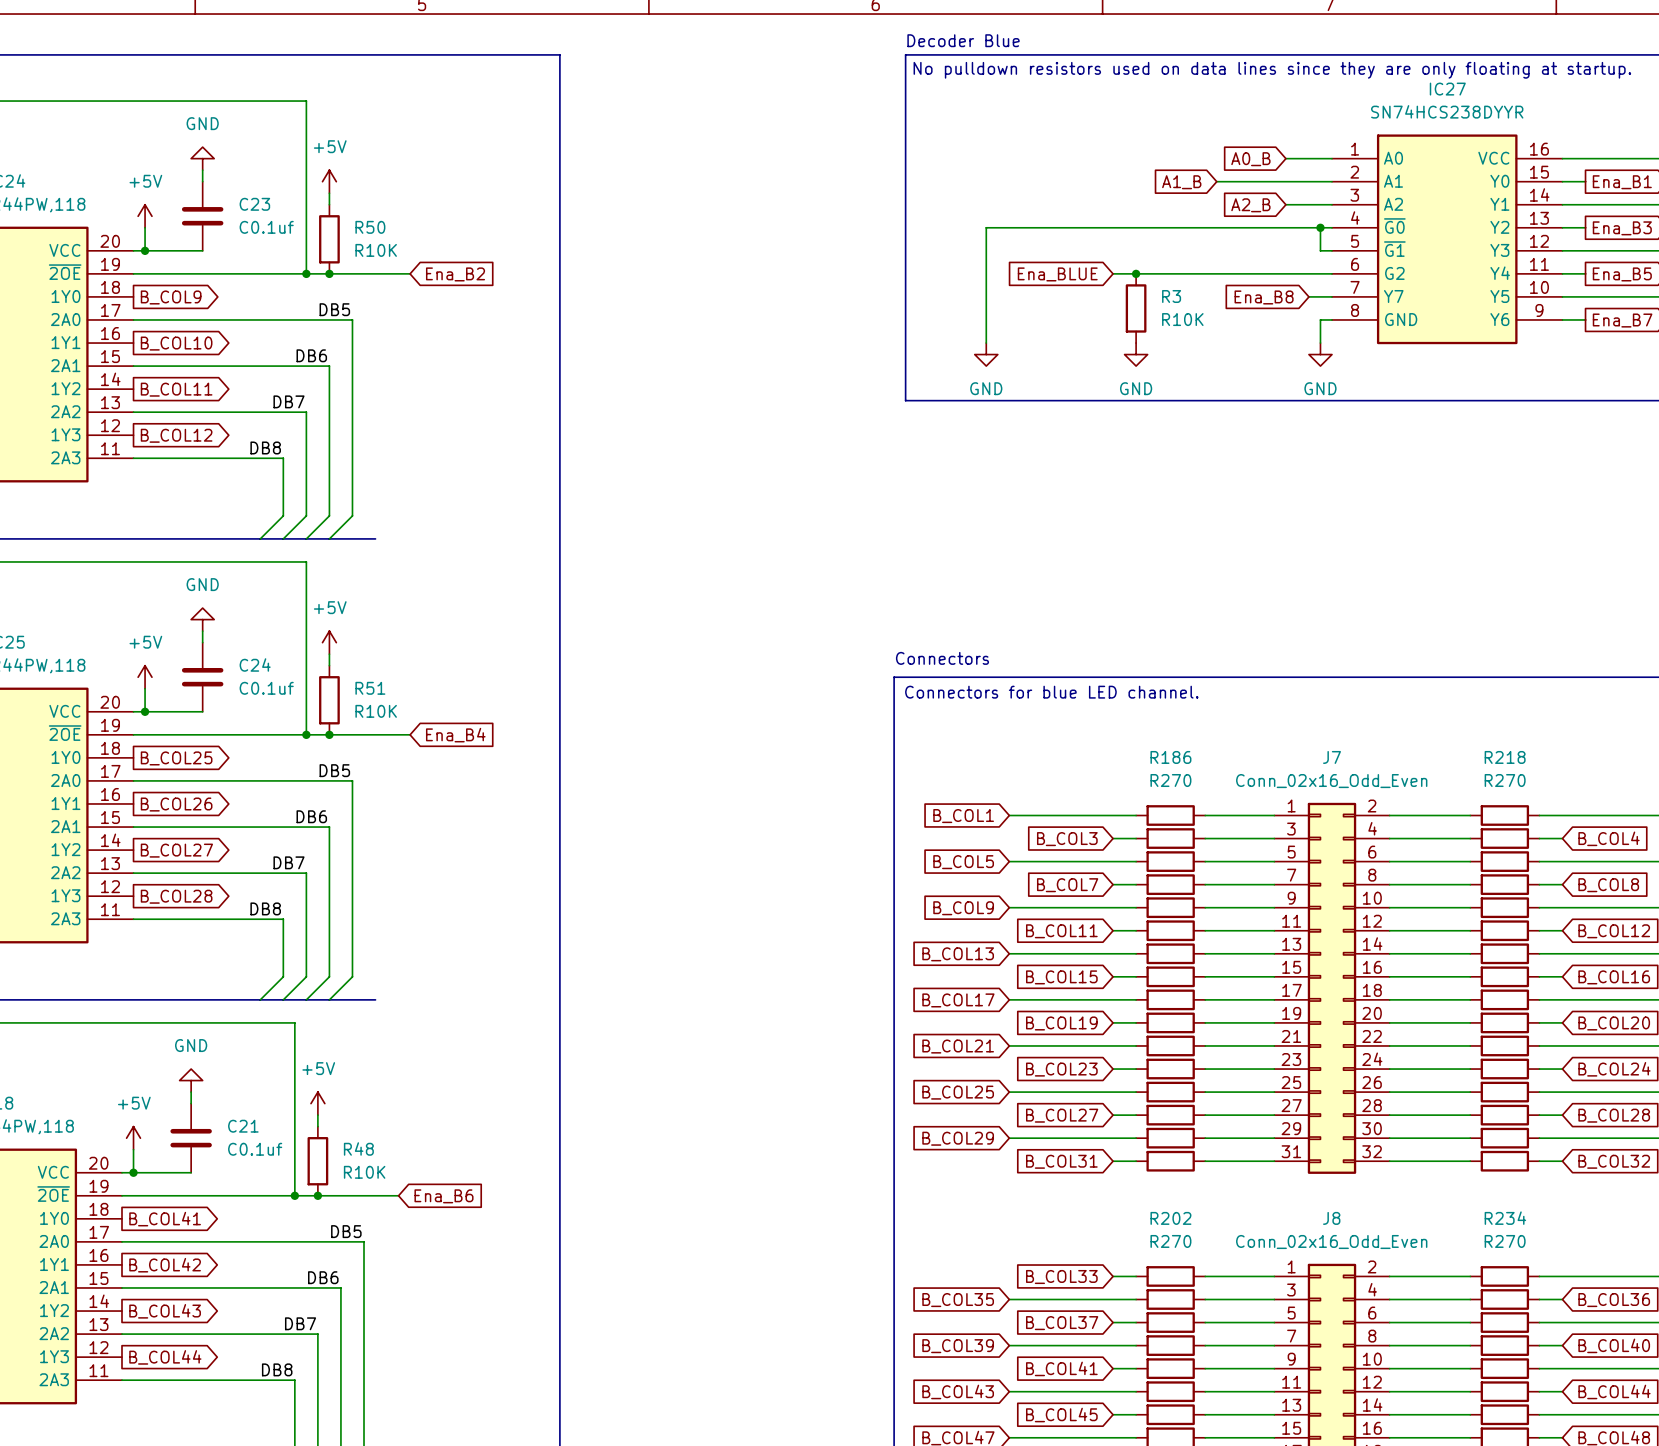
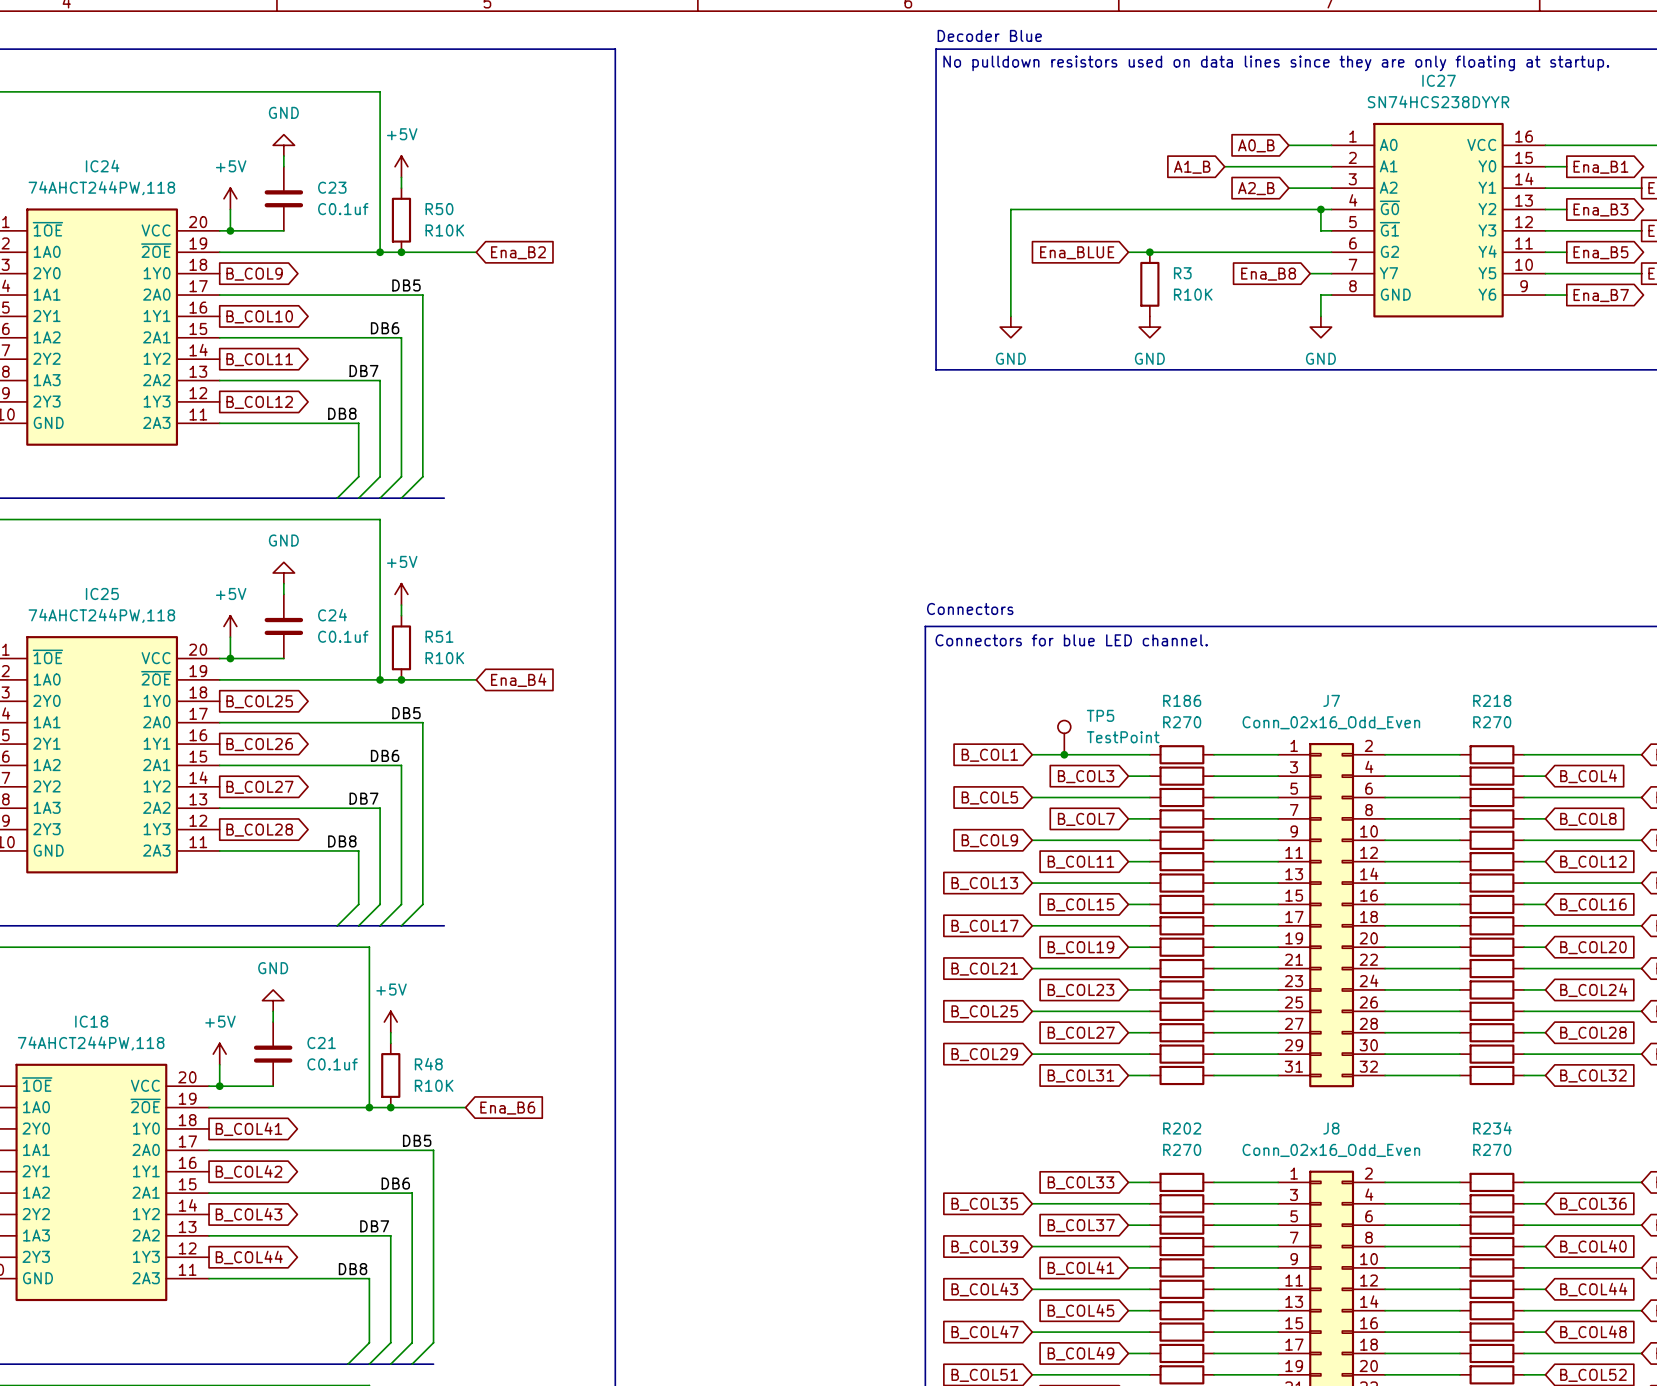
TP5: none -> TestPoint (1064, 737)
junction: none -> (1064, 754)

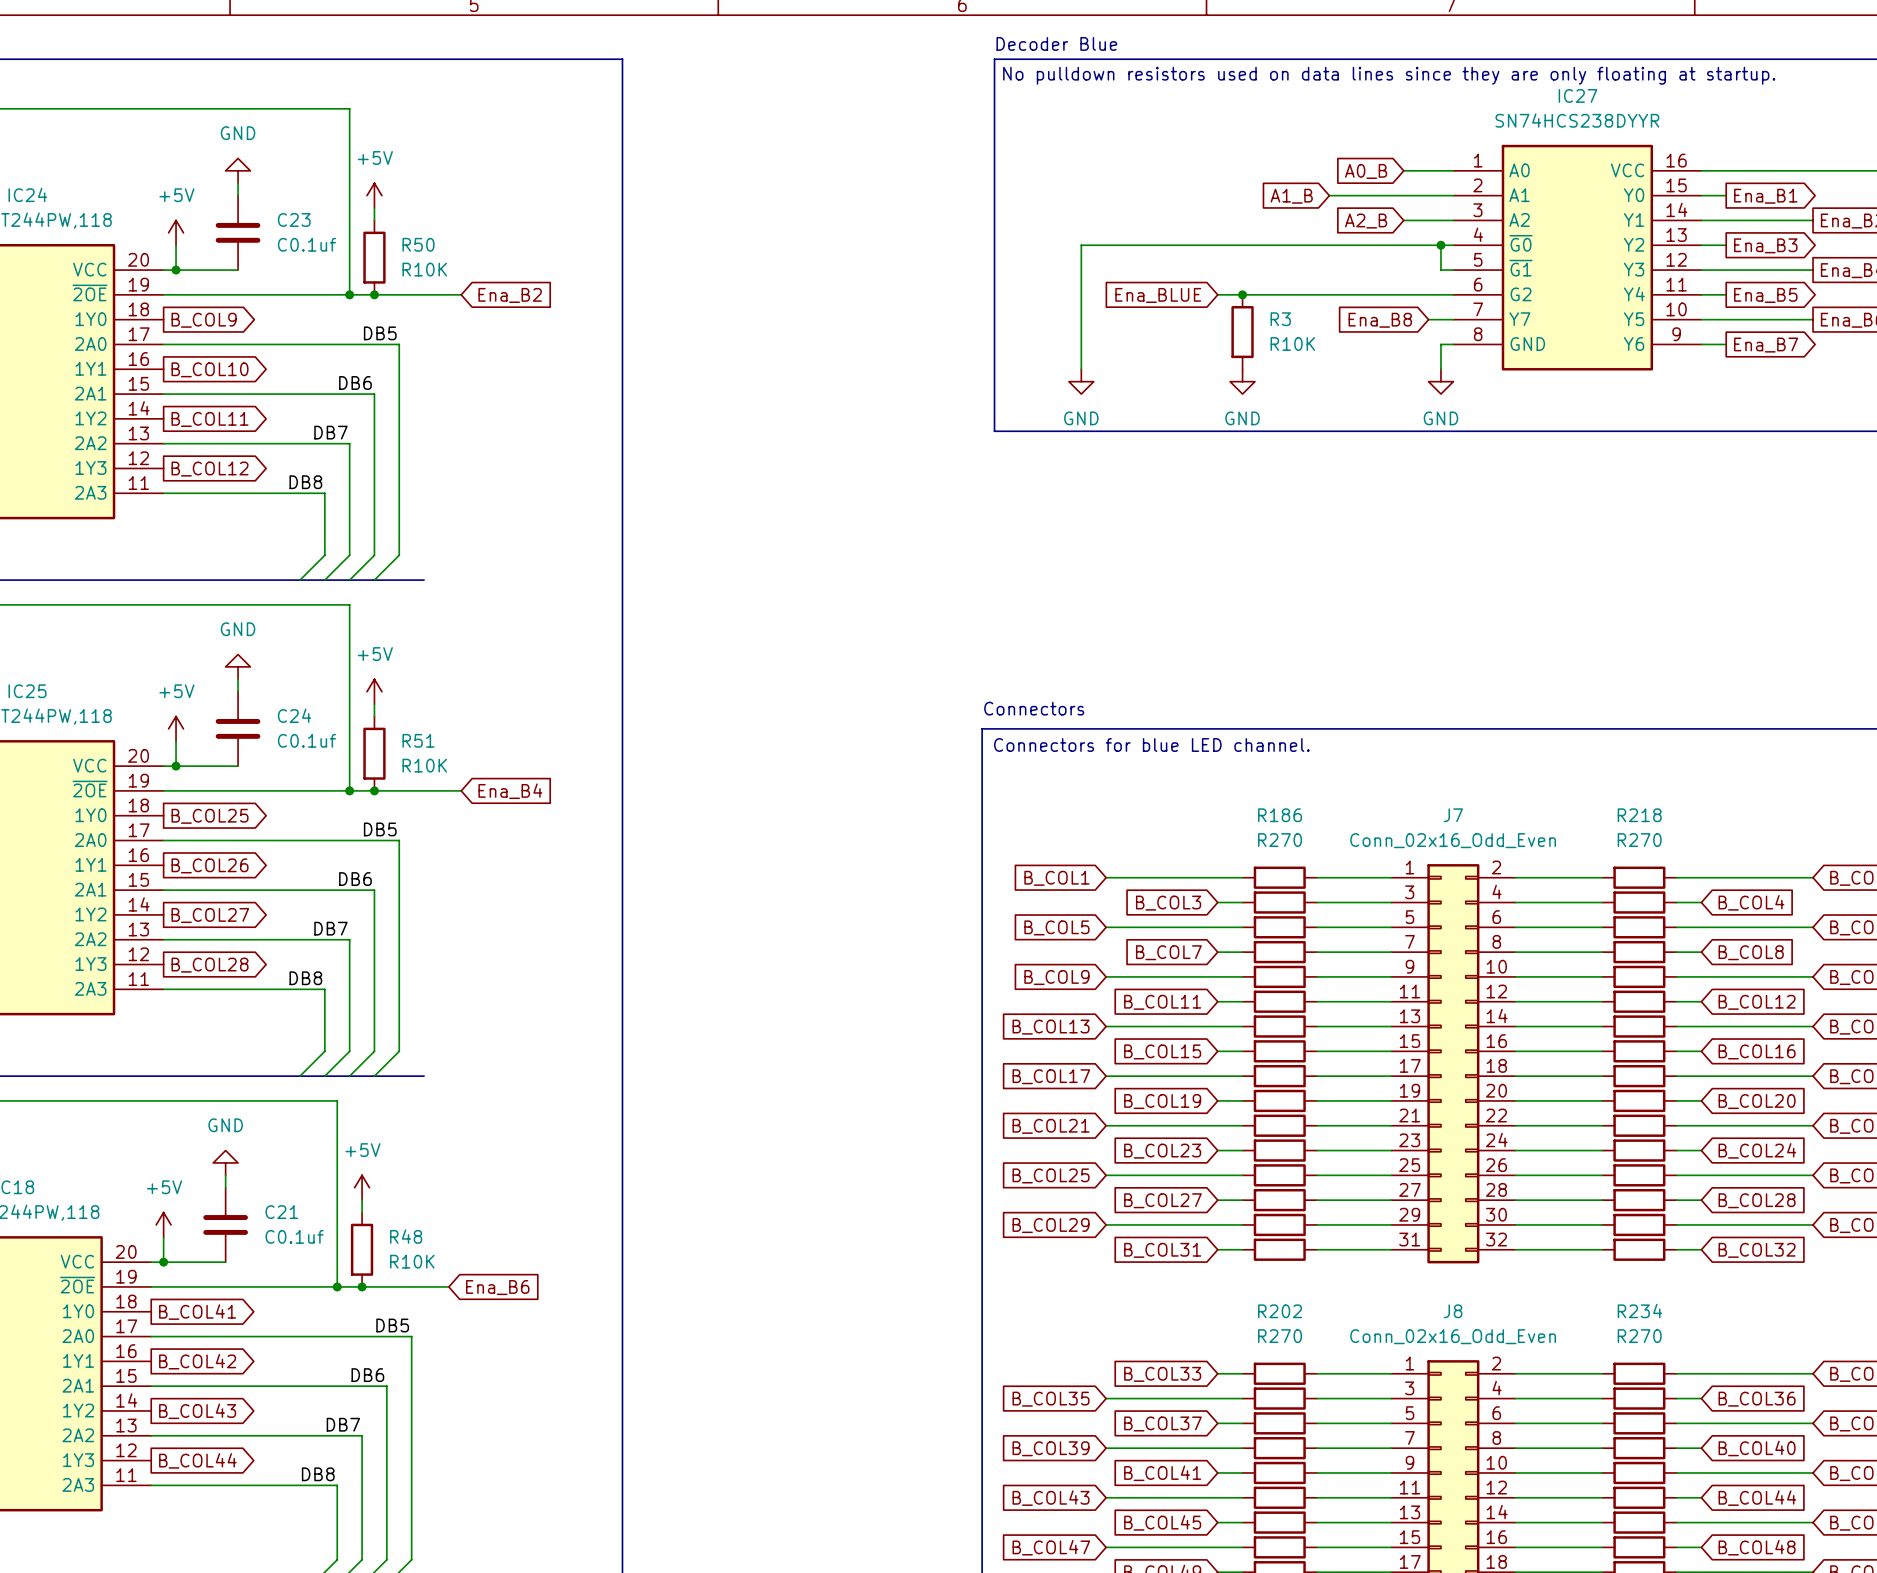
TP5: TestPoint (1064, 737) -> none
junction: (1064, 754) -> none

